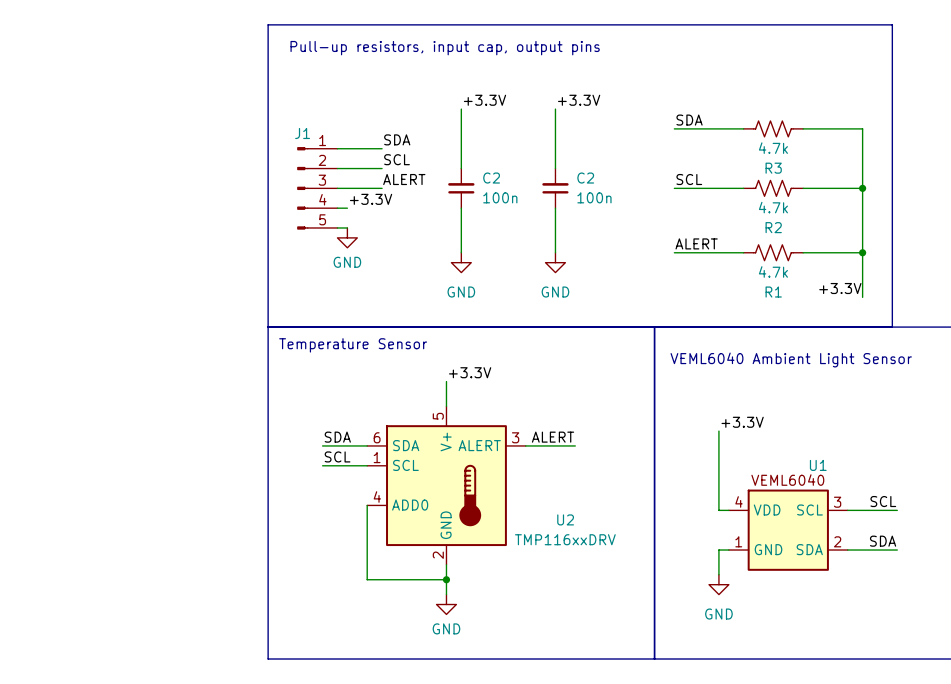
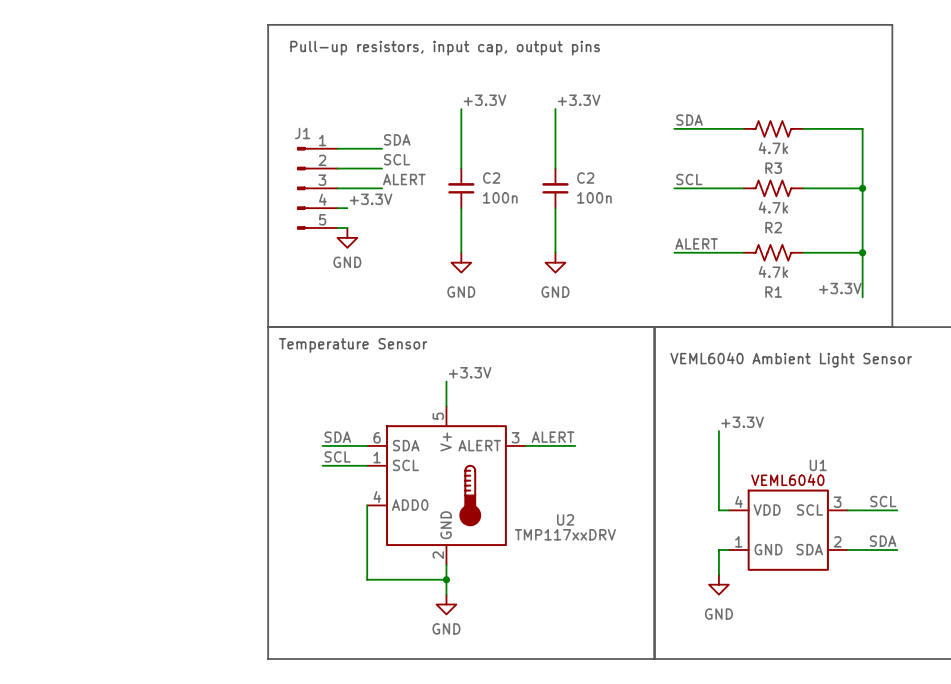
U2 value: TMP116xxDRV (565, 539) -> TMP117xxDRV (565, 534)

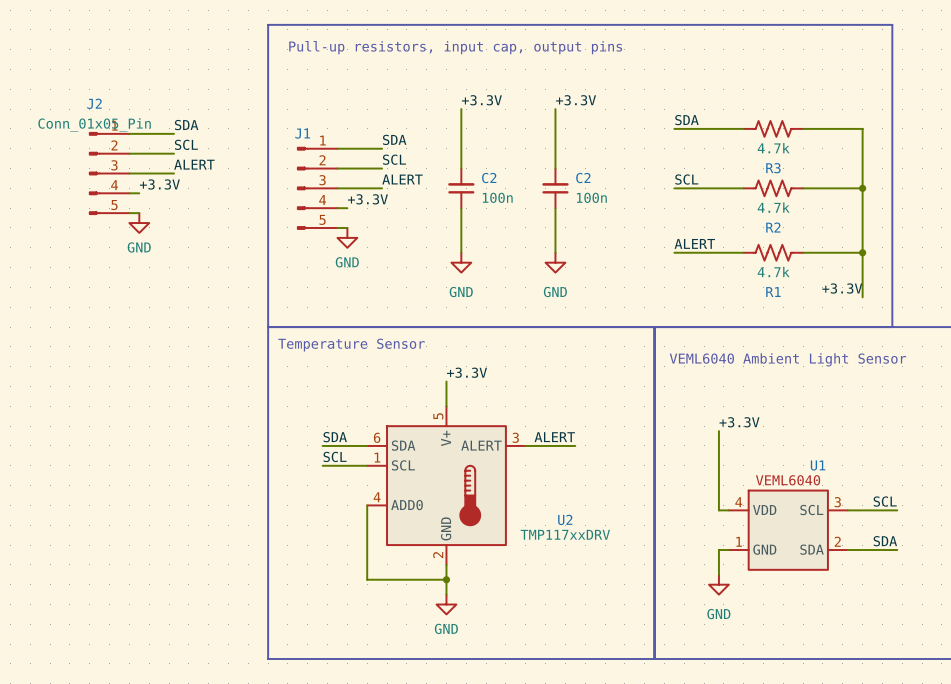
label: none -> SDA (186, 125)
wire: none -> (129, 133) (173, 133)
label: none -> SCL (186, 144)
wire: none -> (129, 153) (173, 153)
label: none -> ALERT (194, 164)
J2: none -> Conn_01x05_Pin (109, 173)
wire: none -> (129, 173) (173, 173)
label: none -> +3.3V (159, 184)
wire: none -> (129, 193) (139, 193)
wire: none -> (129, 213) (139, 213)
power symbol: none -> GND (139, 223)

